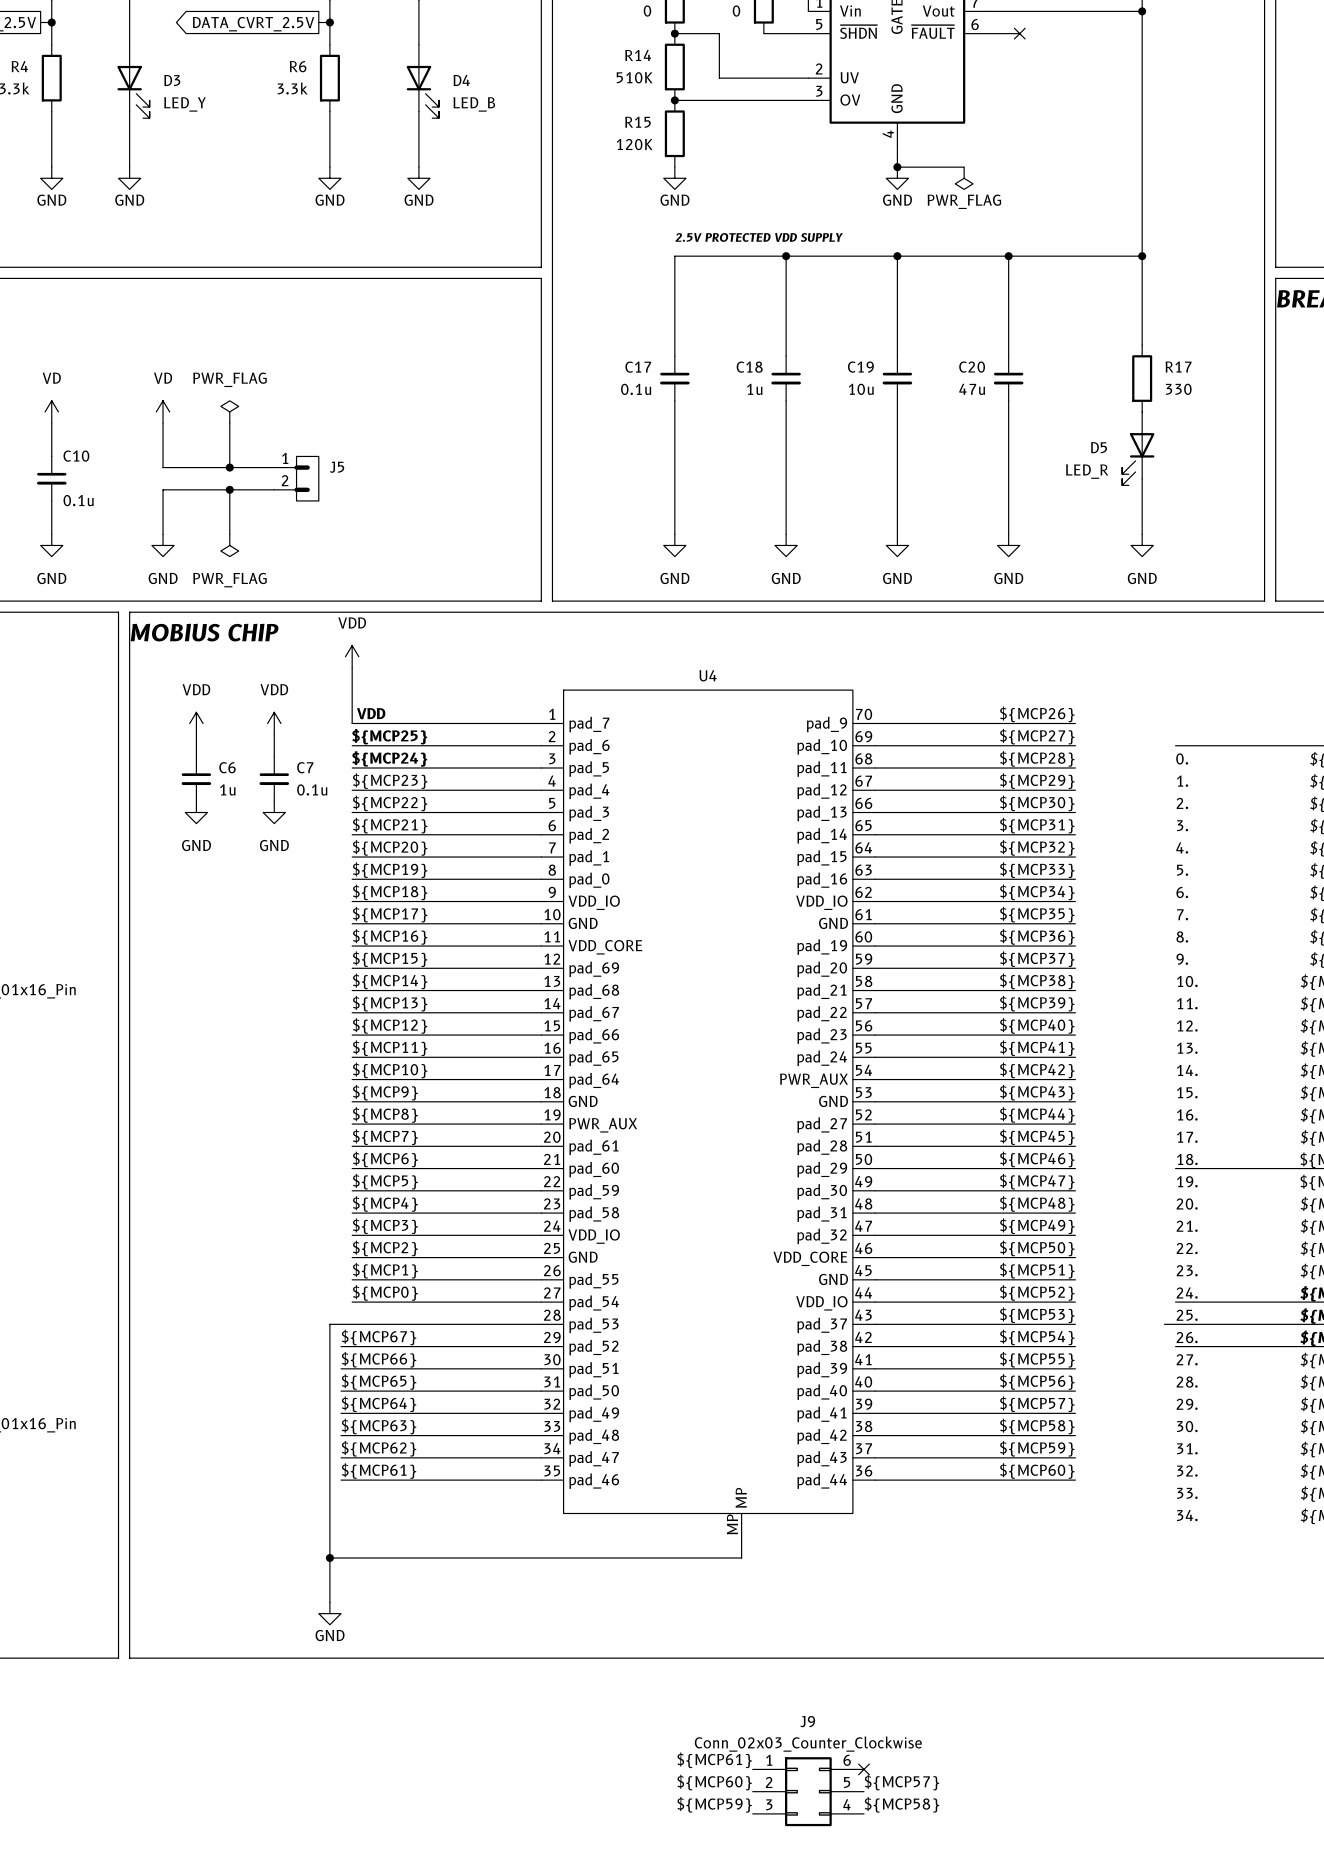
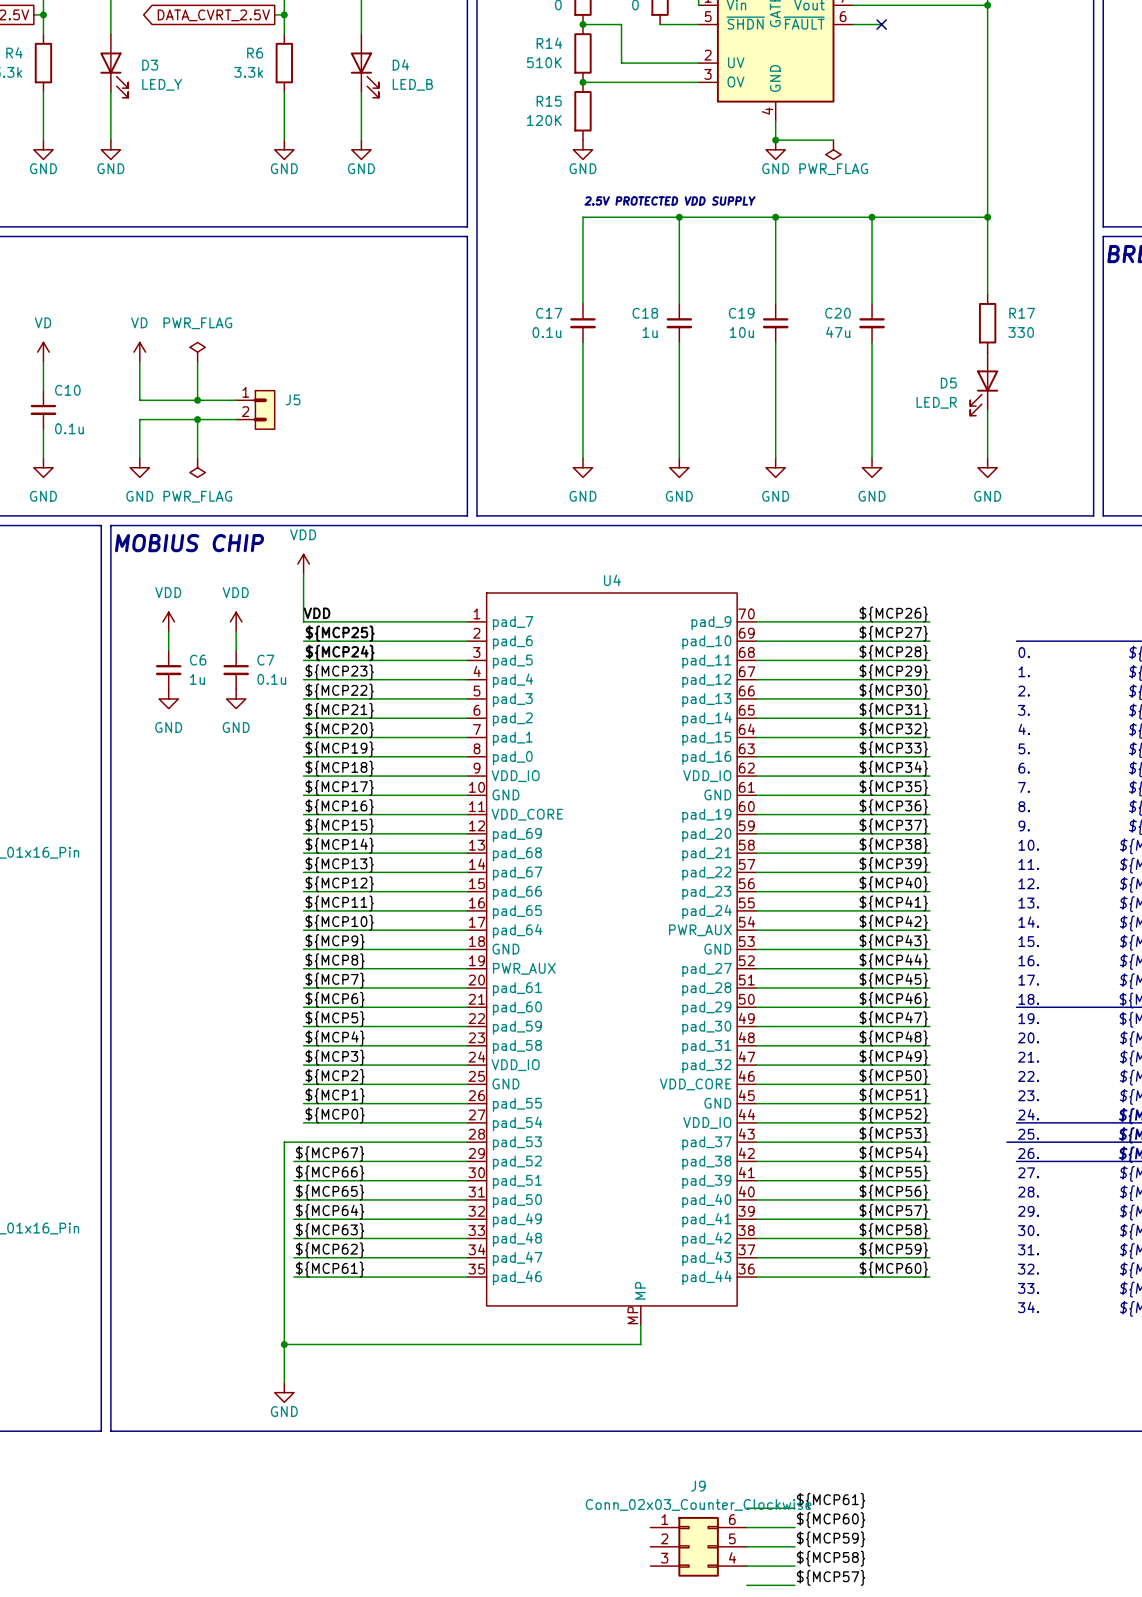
wire: none -> (746, 1508) (794, 1508)
label position: ${MCP61} (714, 1760) -> ${MCP61} (831, 1500)
wire: none -> (746, 1527) (794, 1527)
no-connect mark: (864, 1769) -> none
label position: ${MCP60} (714, 1782) -> ${MCP60} (831, 1520)
label position: ${MCP57} (901, 1782) -> ${MCP57} (831, 1577)
wire: none -> (746, 1546) (794, 1546)
label position: ${MCP59} (714, 1804) -> ${MCP59} (831, 1539)
label position: ${MCP58} (901, 1804) -> ${MCP58} (831, 1558)
wire: none -> (746, 1566) (794, 1566)
wire: none -> (746, 1585) (794, 1585)

